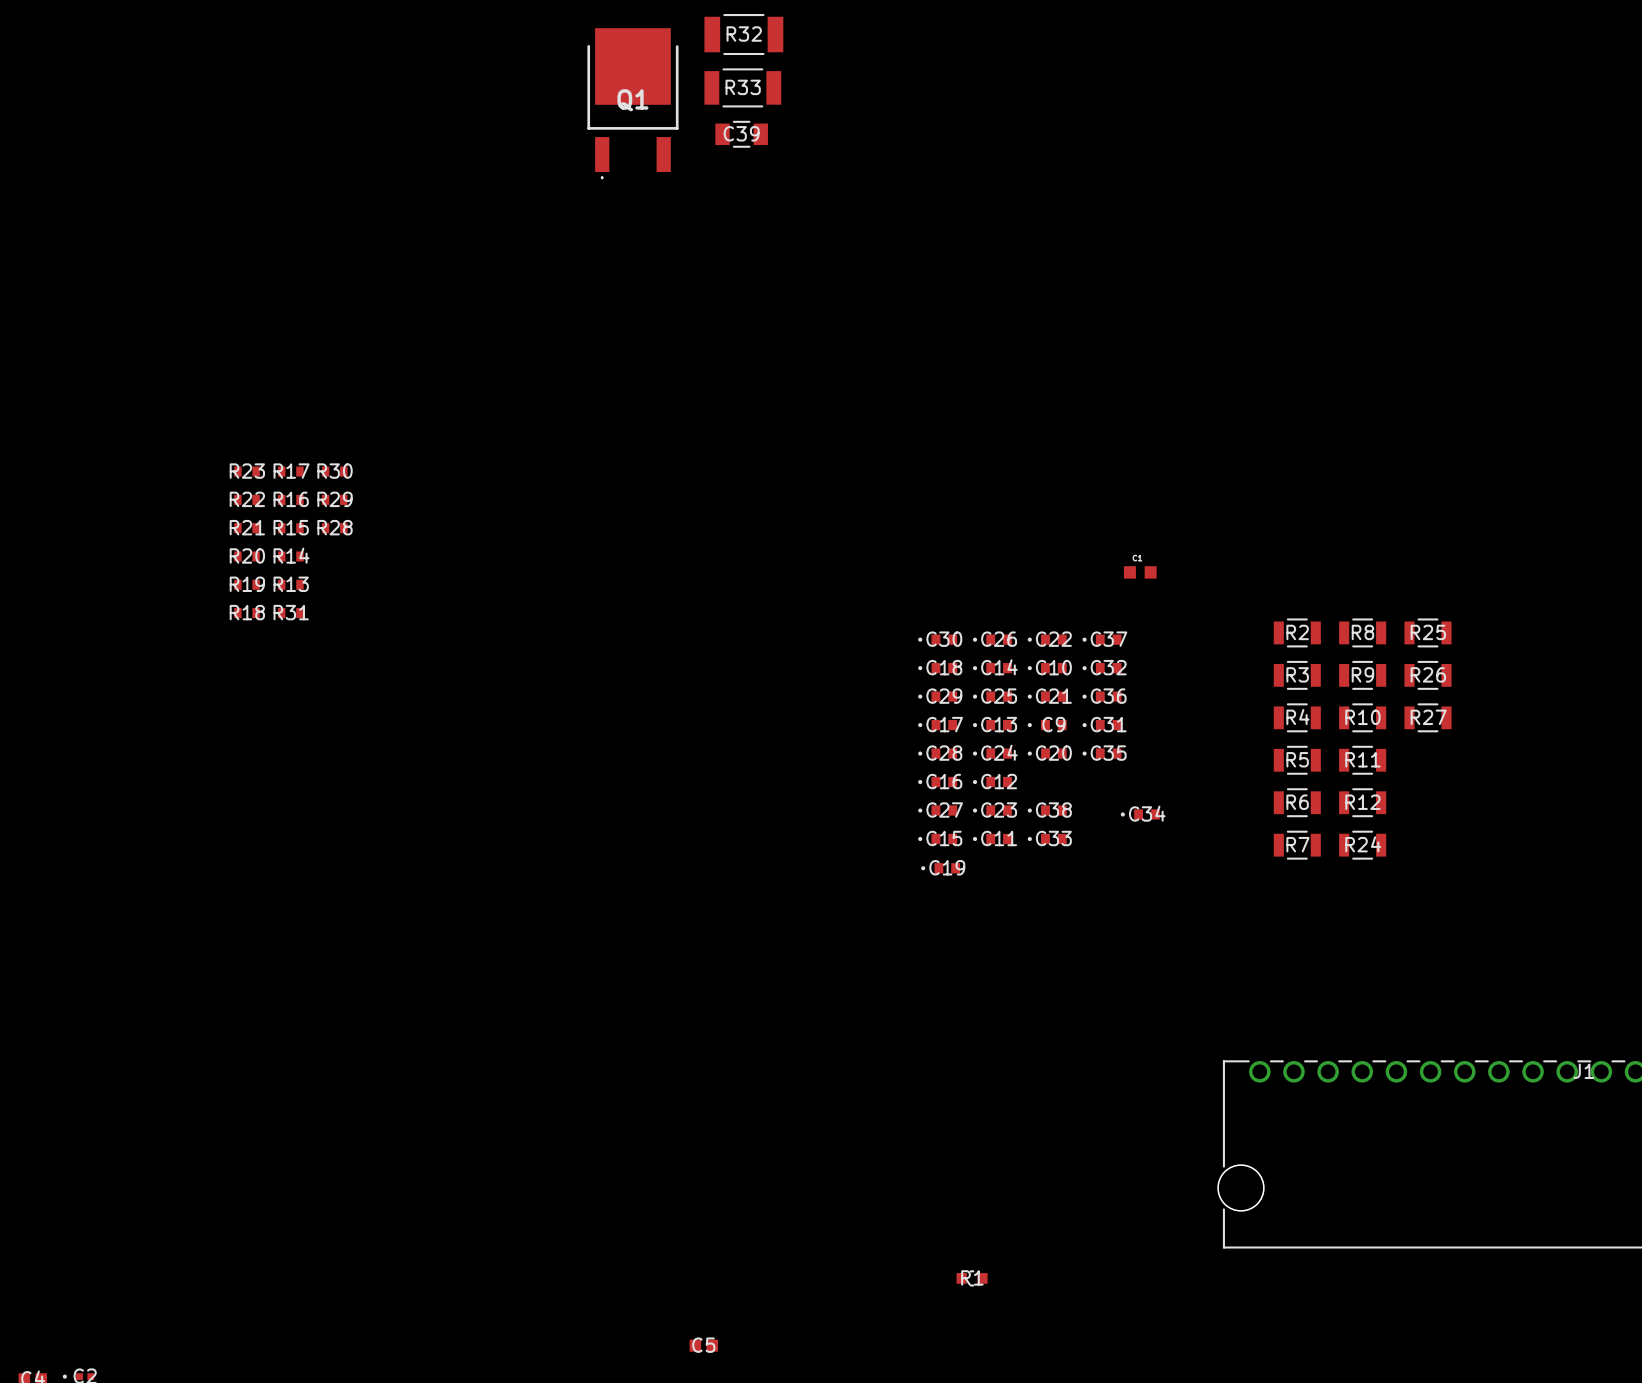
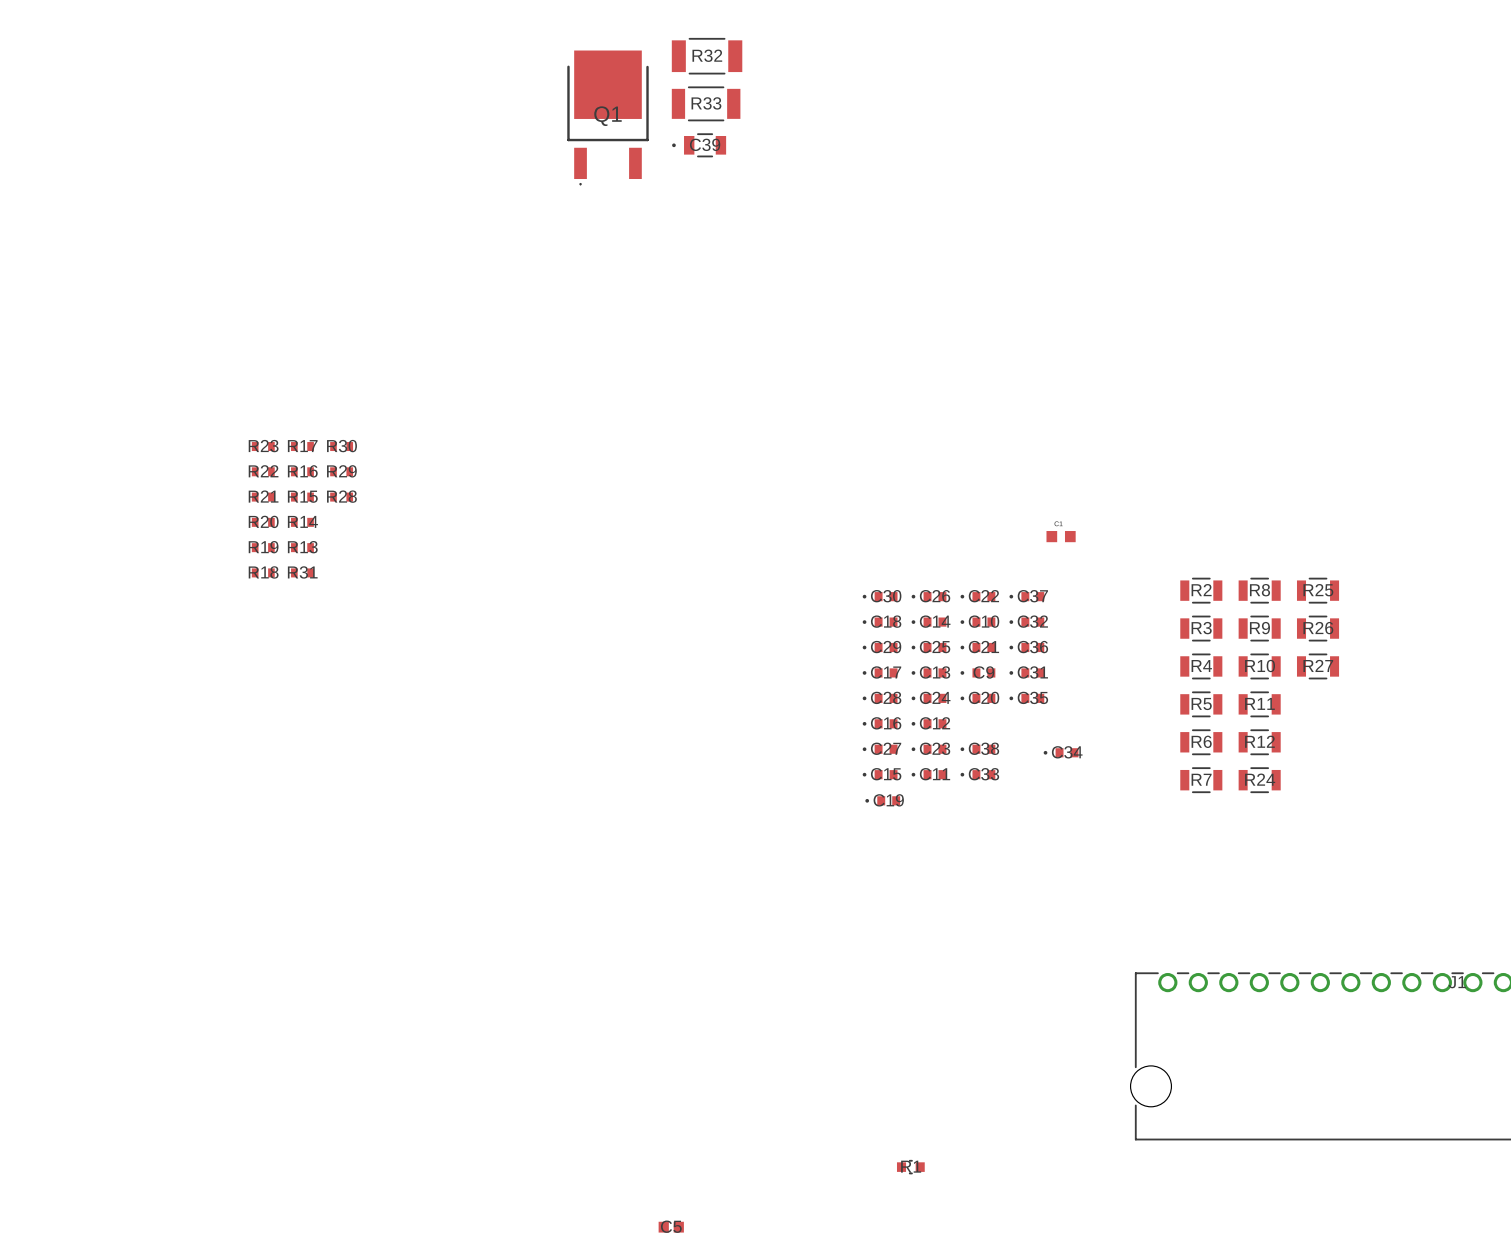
C39 footprint: [715, 120, 768, 148] -> [672, 133, 727, 158]

